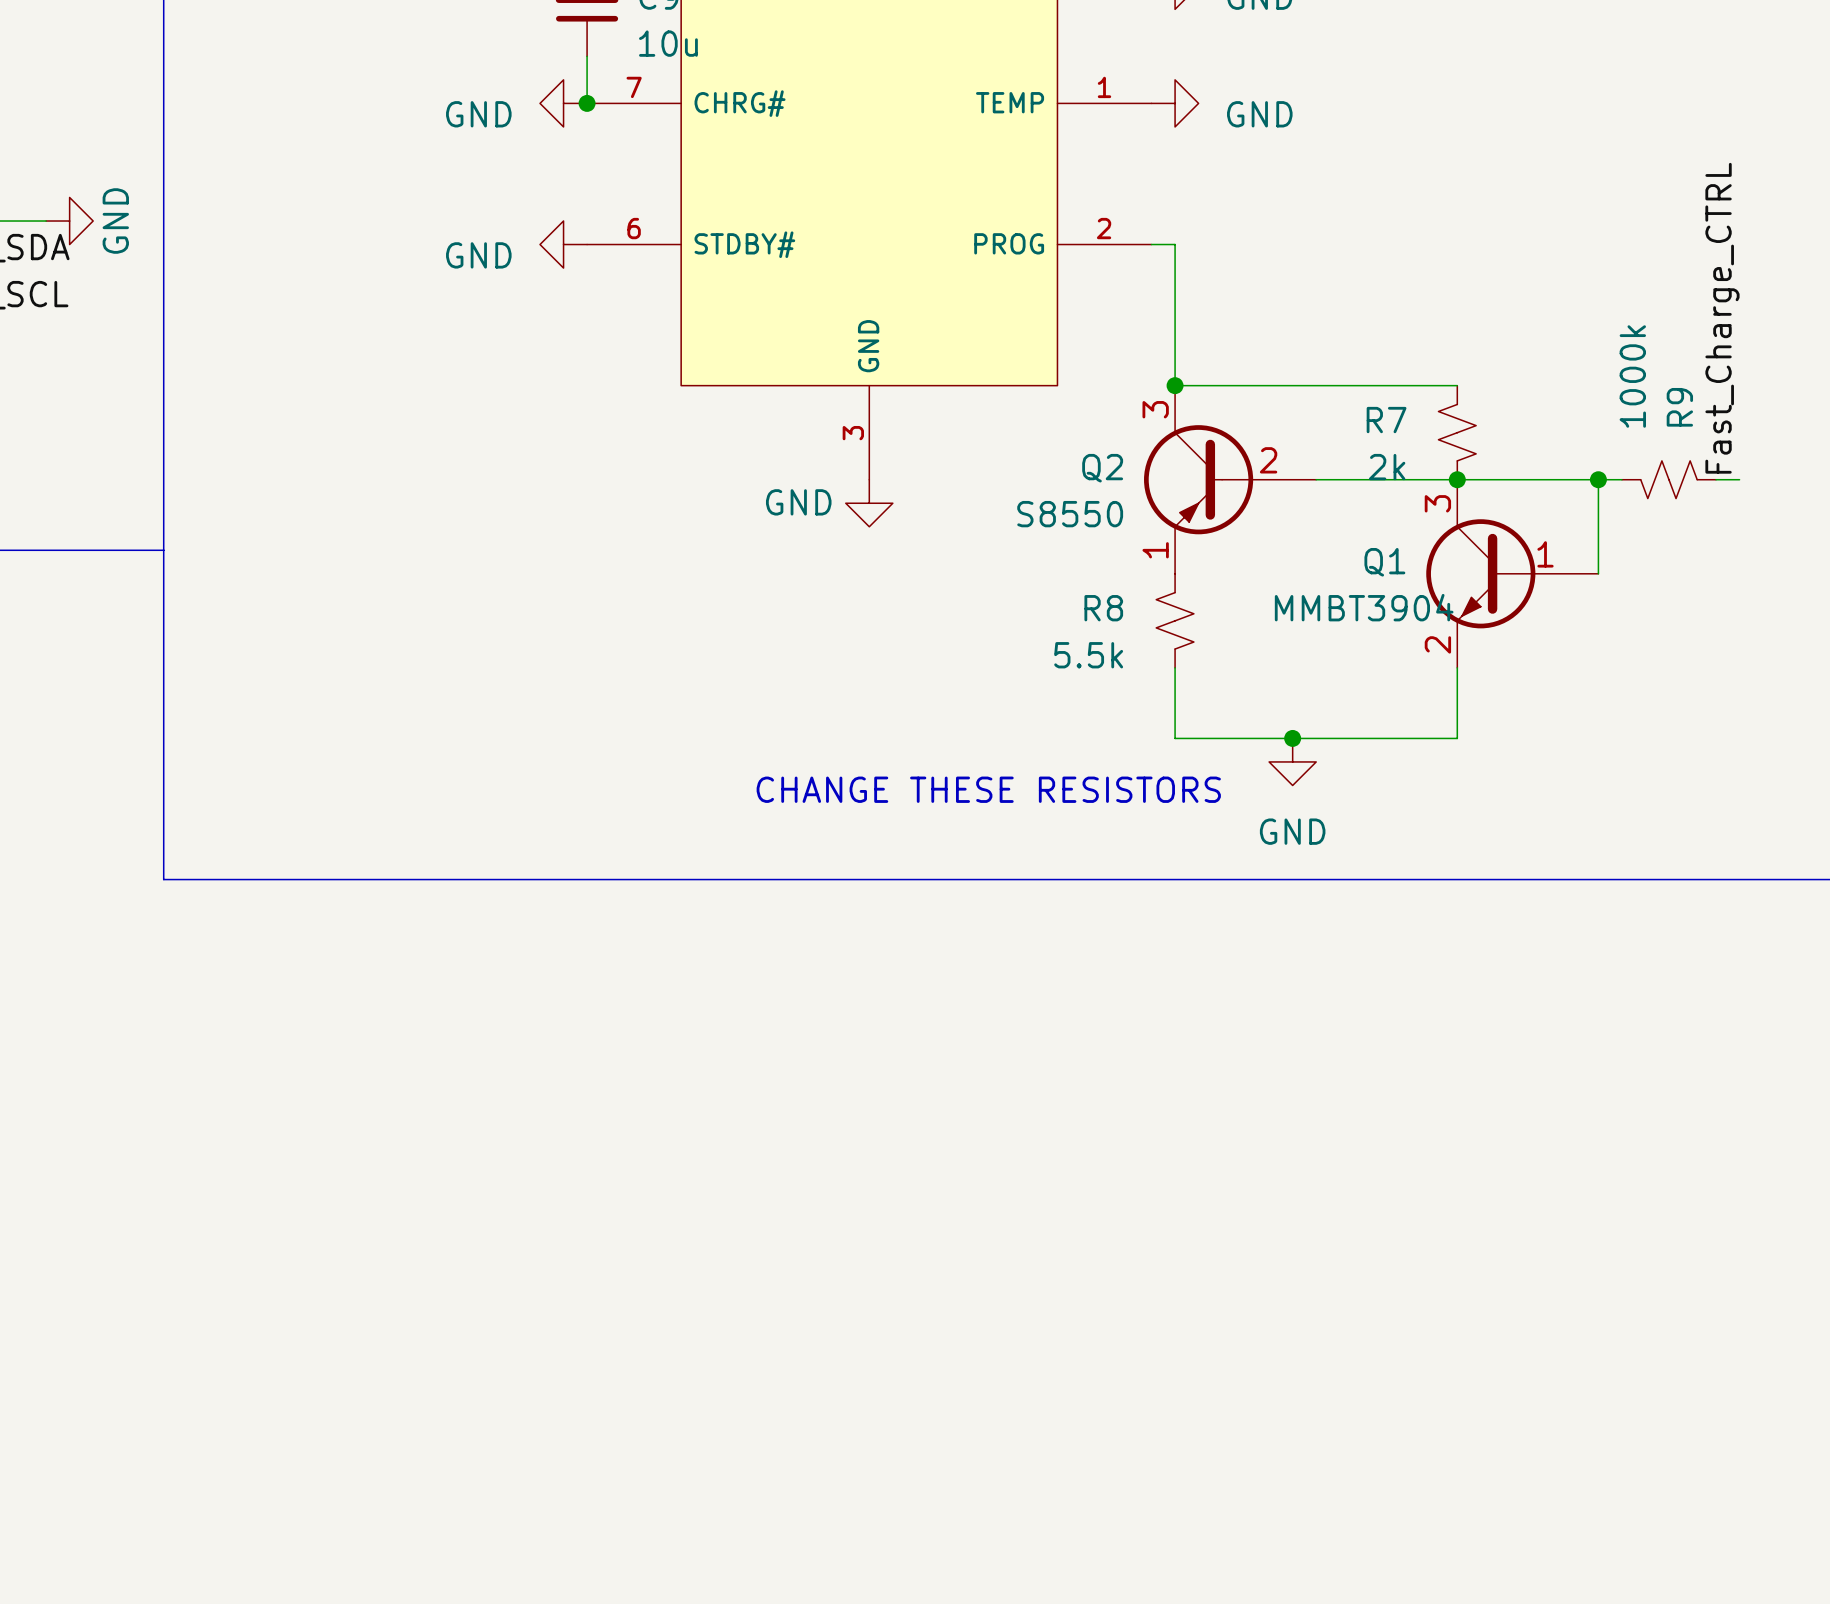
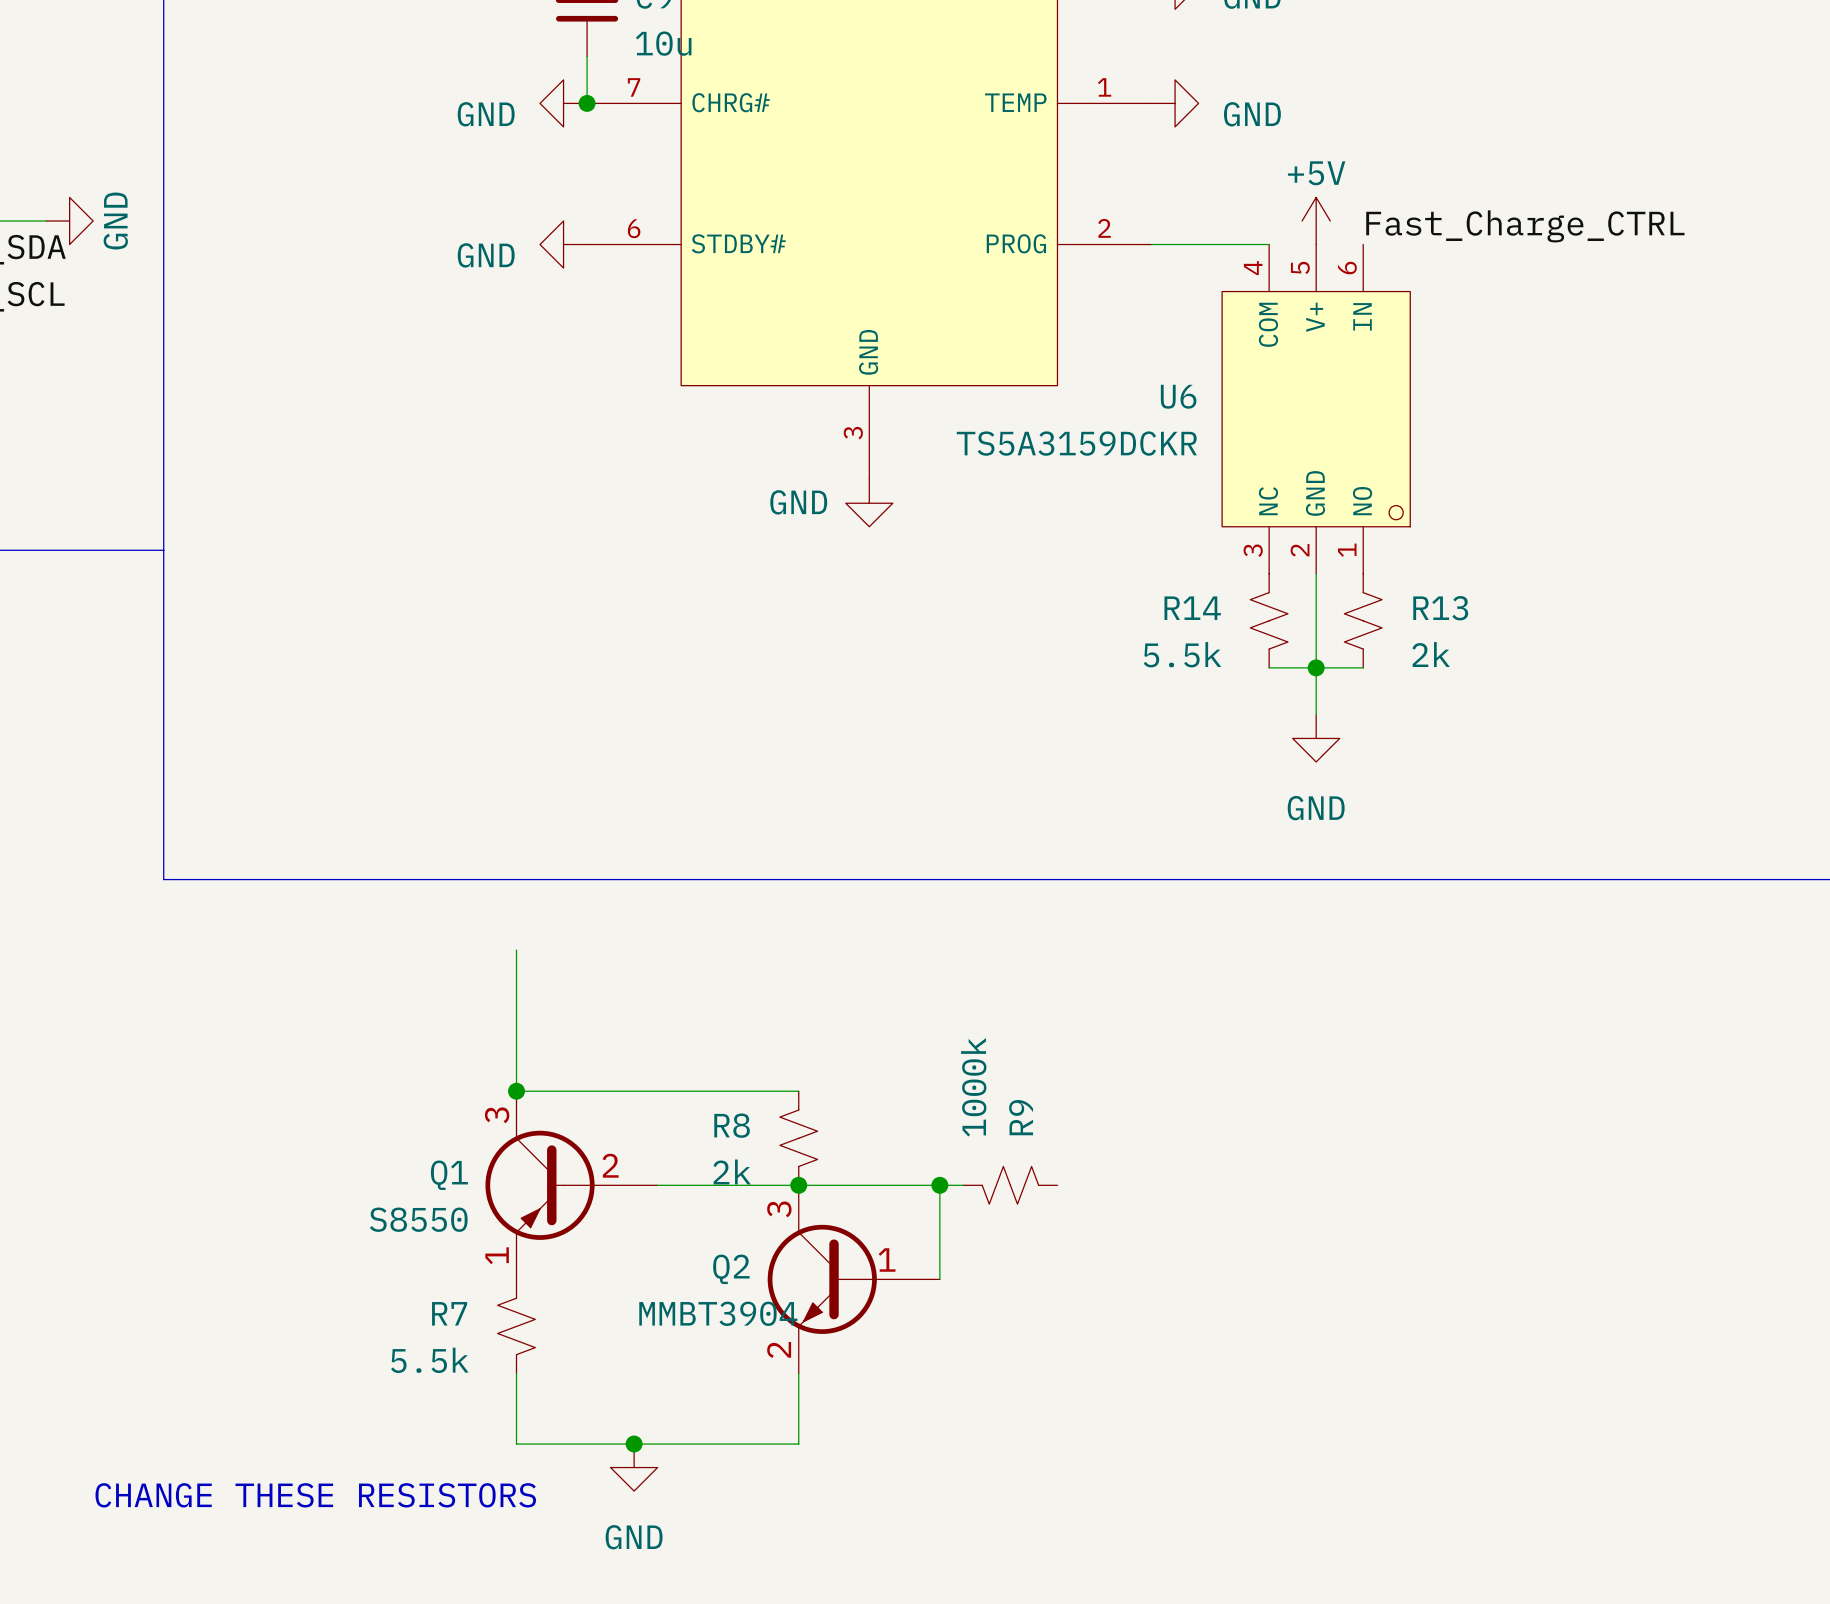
power symbol: none -> +5V (1316, 221)
wire: (1175, 244) (1175, 385) (1457, 385) -> (1175, 244) (1269, 244)
label rotation: 0° (1722, 318) -> 90° clockwise (1525, 226)
Q2 symbol: [1144, 385, 1317, 574] -> [767, 1185, 940, 1374]
junction: (1175, 385) -> none
U6: none -> TS5A3159DCKR (1316, 409)
R7 position: (1457, 432) -> (516, 1326)
R7 value: 2k (1387, 467) -> 5.5k (429, 1360)
wire: (1316, 479) (1621, 479) -> none
Q1 symbol: [1426, 479, 1599, 668] -> [485, 1091, 658, 1280]
junction: (1457, 479) -> none
wire: (1598, 479) (1598, 573) -> none
junction: (1598, 479) -> none
R9 position: (1668, 479) -> (1010, 1185)
wire: (1716, 479) (1739, 479) -> none
Q2 value: S8550 (1070, 514) -> MMBT3904 (718, 1313)
wire: none -> (1316, 573) (1316, 714)
Q1 value: MMBT3904 (1364, 607) -> S8550 (418, 1219)
R8 position: (1175, 620) -> (798, 1138)
R14: none -> 5.5k (1269, 620)
R13: none -> 2k (1363, 620)
R8 value: 5.5k (1088, 655) -> 2k (732, 1171)
wire: (1175, 667) (1175, 738) (1457, 738) (1457, 667) -> none
wire: none -> (1269, 667) (1363, 667)
junction position: (1292, 738) -> (1316, 667)
power symbol position: GND (1292, 761) -> GND (1316, 738)
text: CHANGE THESE RESISTORS (988, 789) -> none
wire: none -> (516, 950) (516, 1091) (798, 1091)
junction: none -> (516, 1091)
wire: none -> (657, 1185) (963, 1185)
junction: none -> (798, 1185)
wire: none -> (939, 1185) (939, 1279)
junction: none -> (939, 1185)
wire: none -> (516, 1373) (516, 1444) (798, 1444) (798, 1373)
junction: none -> (634, 1444)
power symbol: none -> GND (634, 1467)
text: none -> CHANGE THESE RESISTORS (315, 1495)

